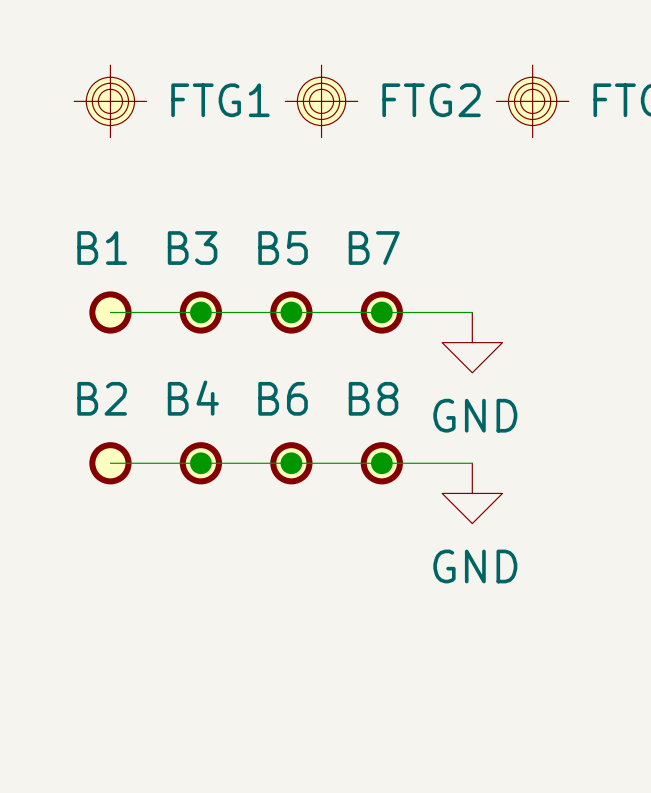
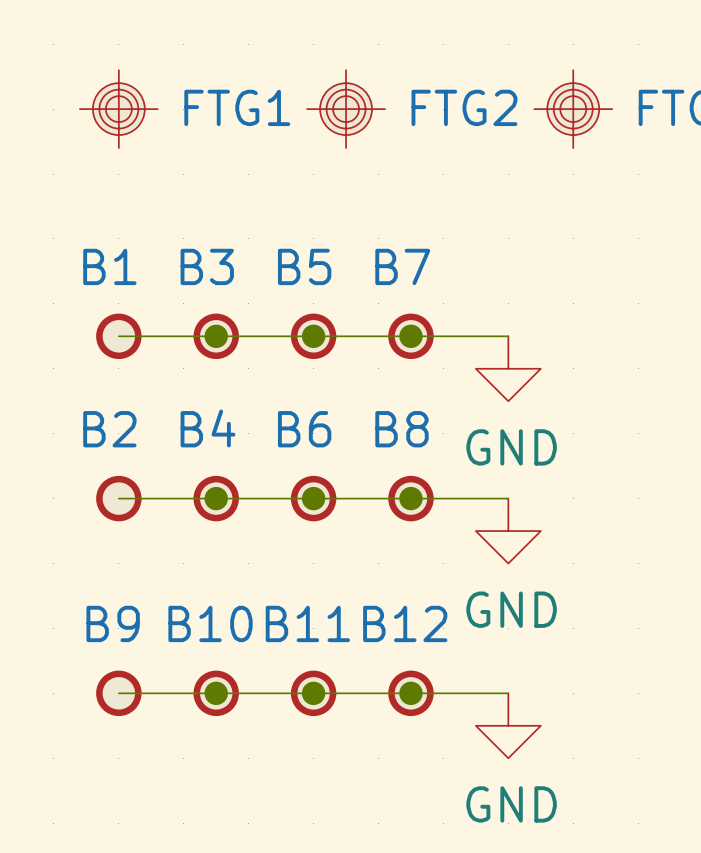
wire: none -> (118, 693) (508, 693)
B9: none -> (118, 693)
B10: none -> (216, 693)
junction: none -> (216, 693)
B11: none -> (313, 693)
junction: none -> (313, 693)
B12: none -> (410, 693)
junction: none -> (410, 693)
power symbol: none -> GND (508, 725)

